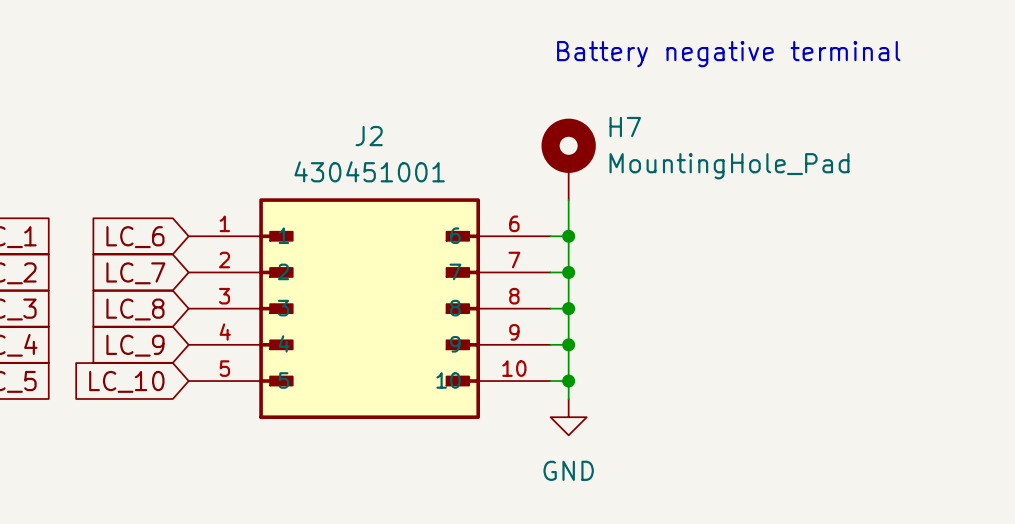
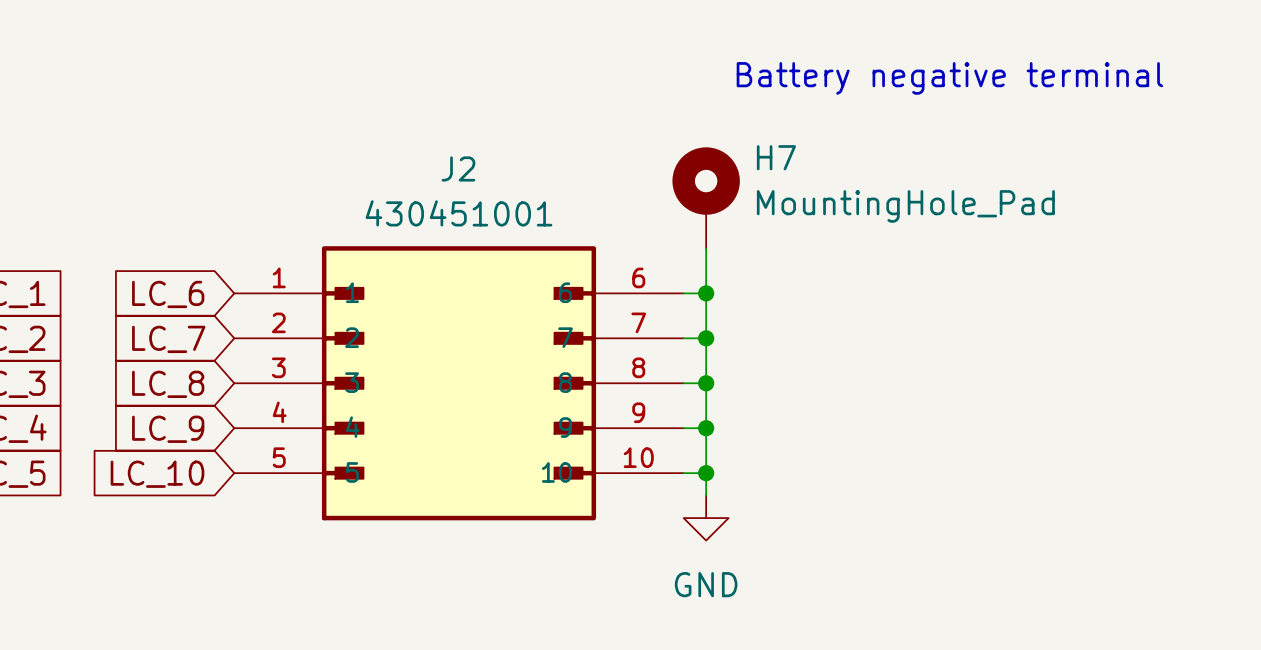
text position: Battery negative terminal (728, 54) -> Battery negative terminal (949, 78)

